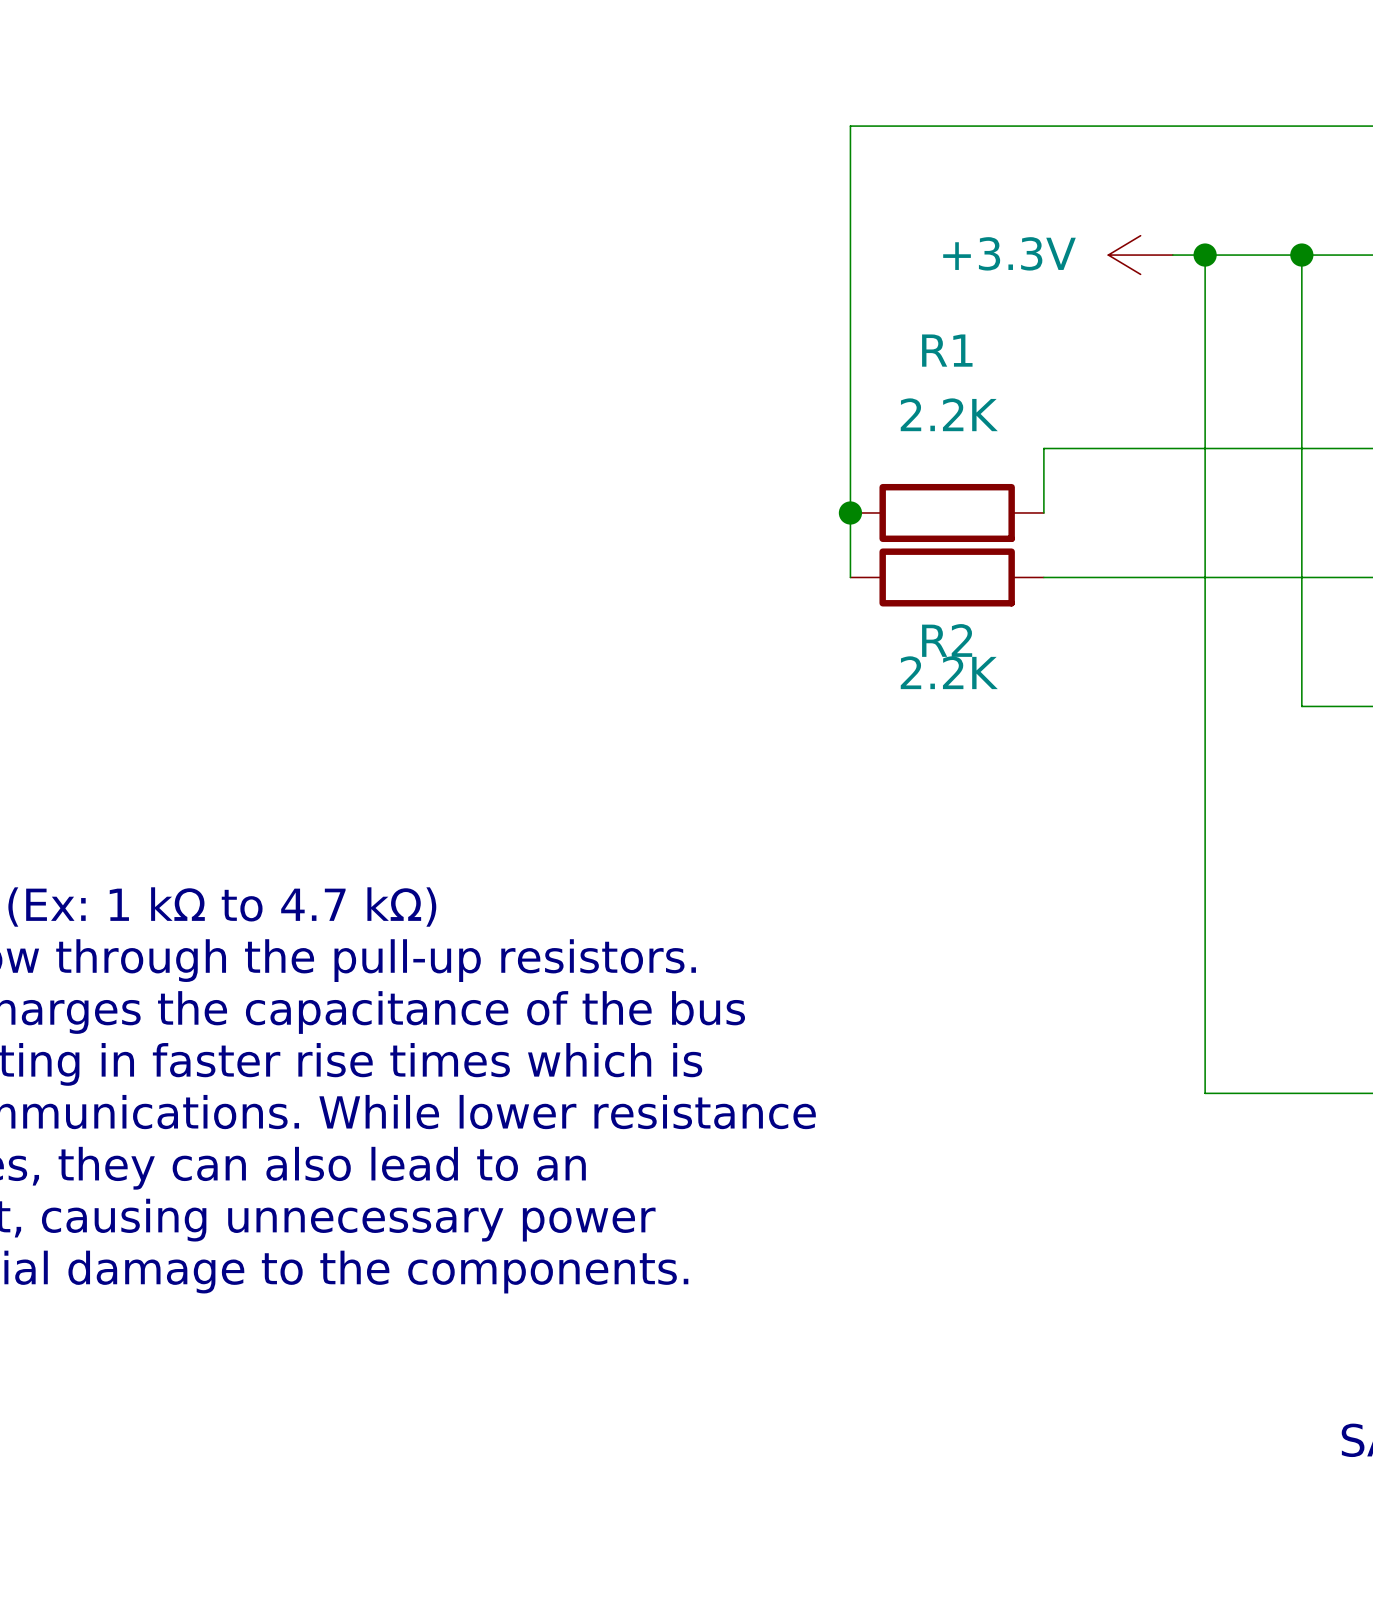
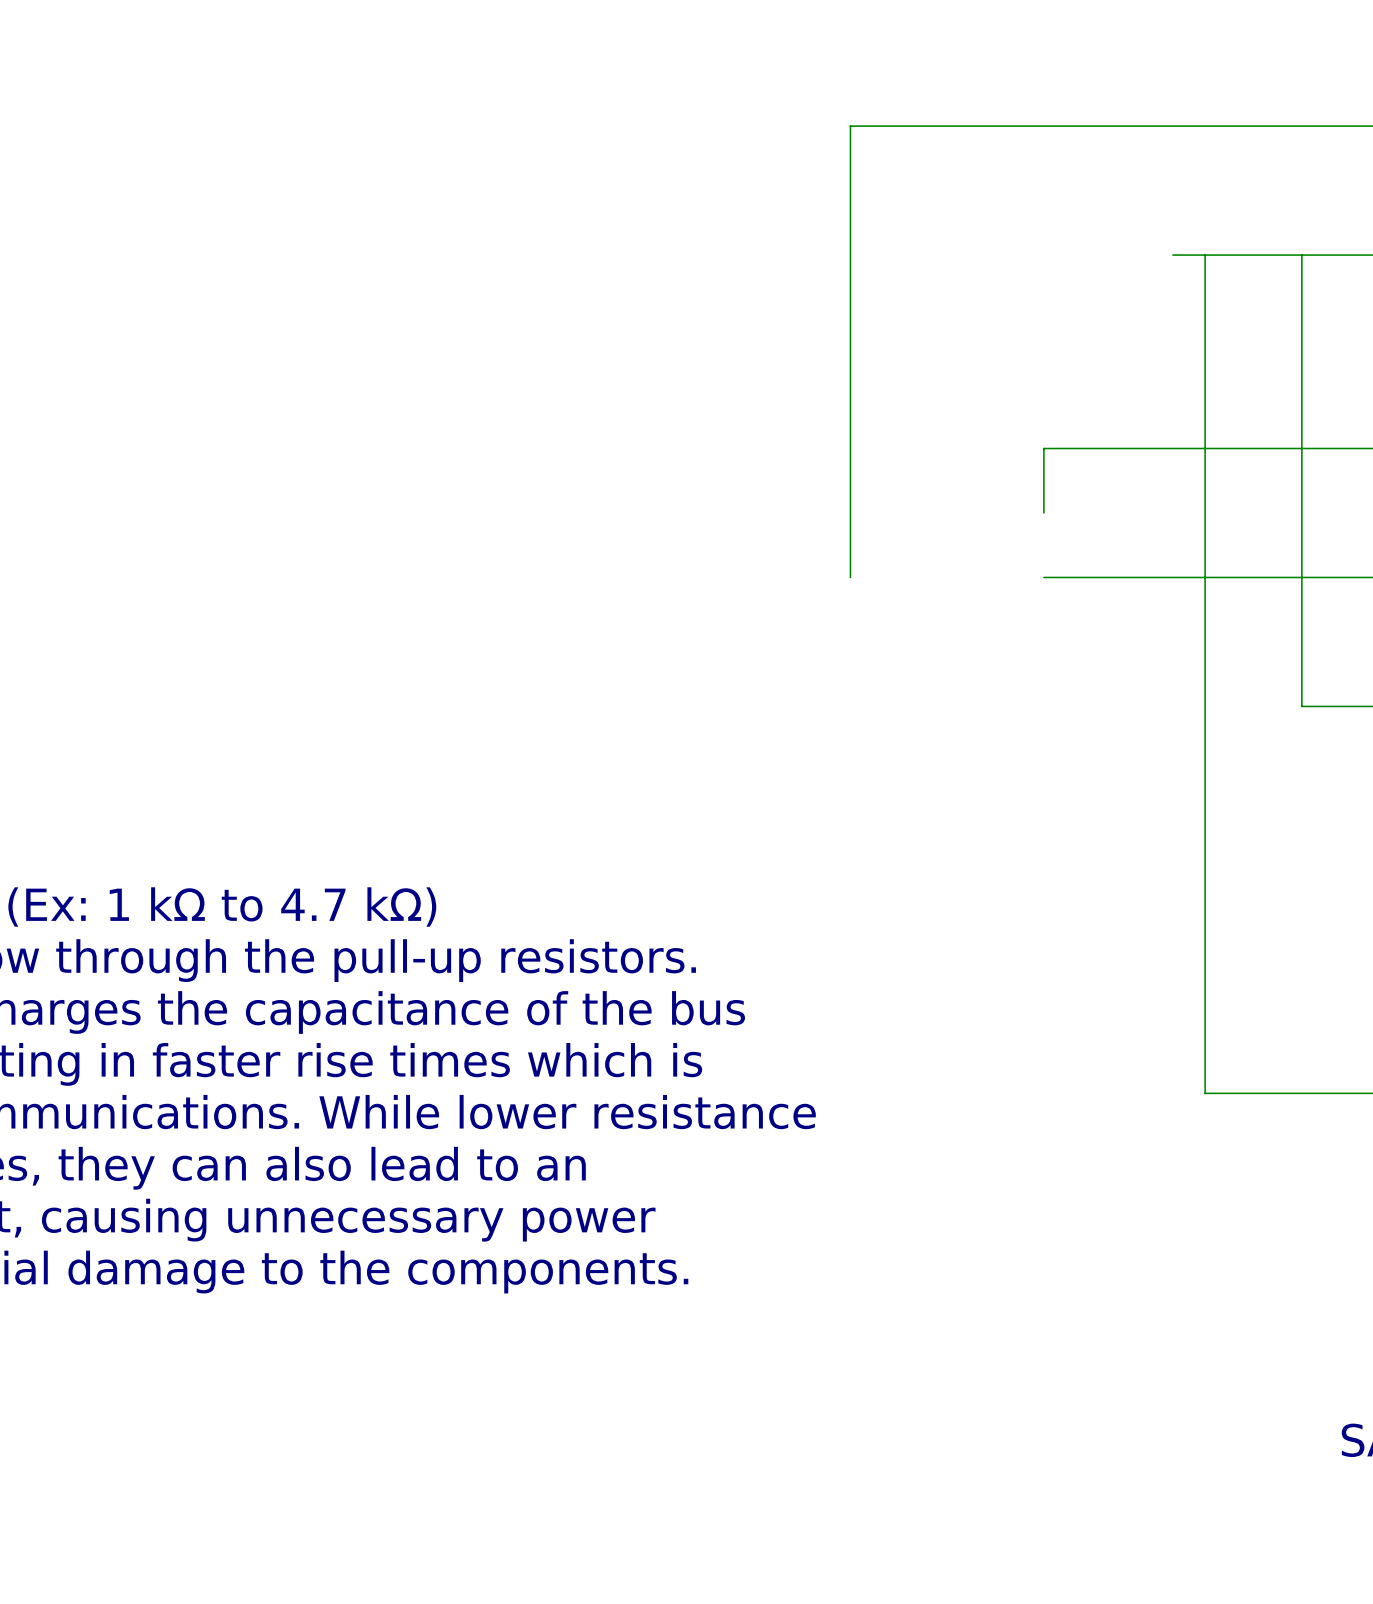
power symbol: +3.3V (1140, 255) -> none
junction: (1205, 255) -> none
junction: (1301, 255) -> none
junction: (850, 512) -> none
R1: 2.2K (947, 512) -> none
R2: 2.2K (947, 577) -> none

